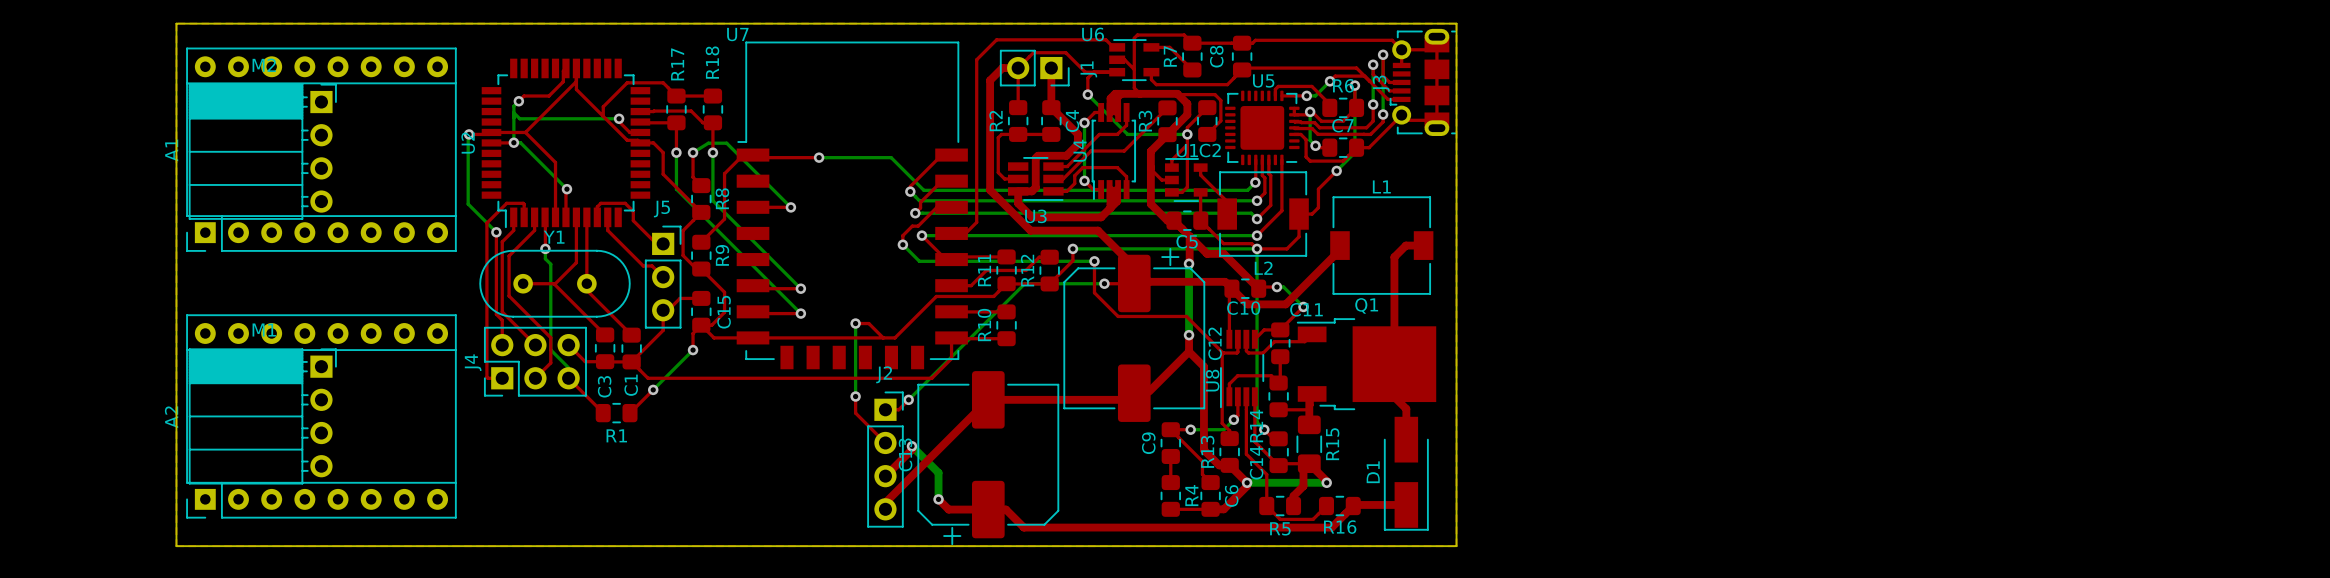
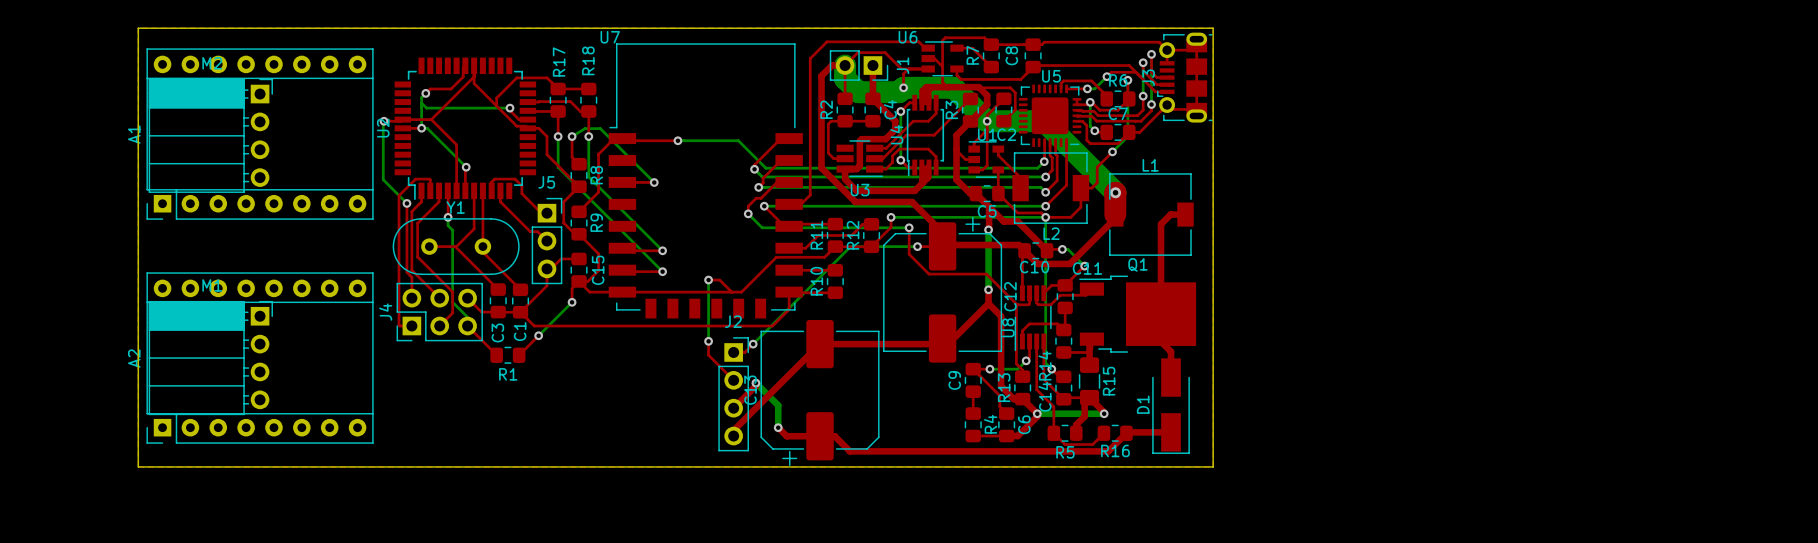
bottom track: none -> (845, 65) (845, 78) (858, 92) (899, 92) (903, 87) (953, 87) (987, 121) (1044, 121) (1115, 192)
bottom track: (1087, 94) (1127, 134) (1187, 134) -> none
top track: none -> (1115, 192) (1115, 214)
via: none -> (1115, 192)

